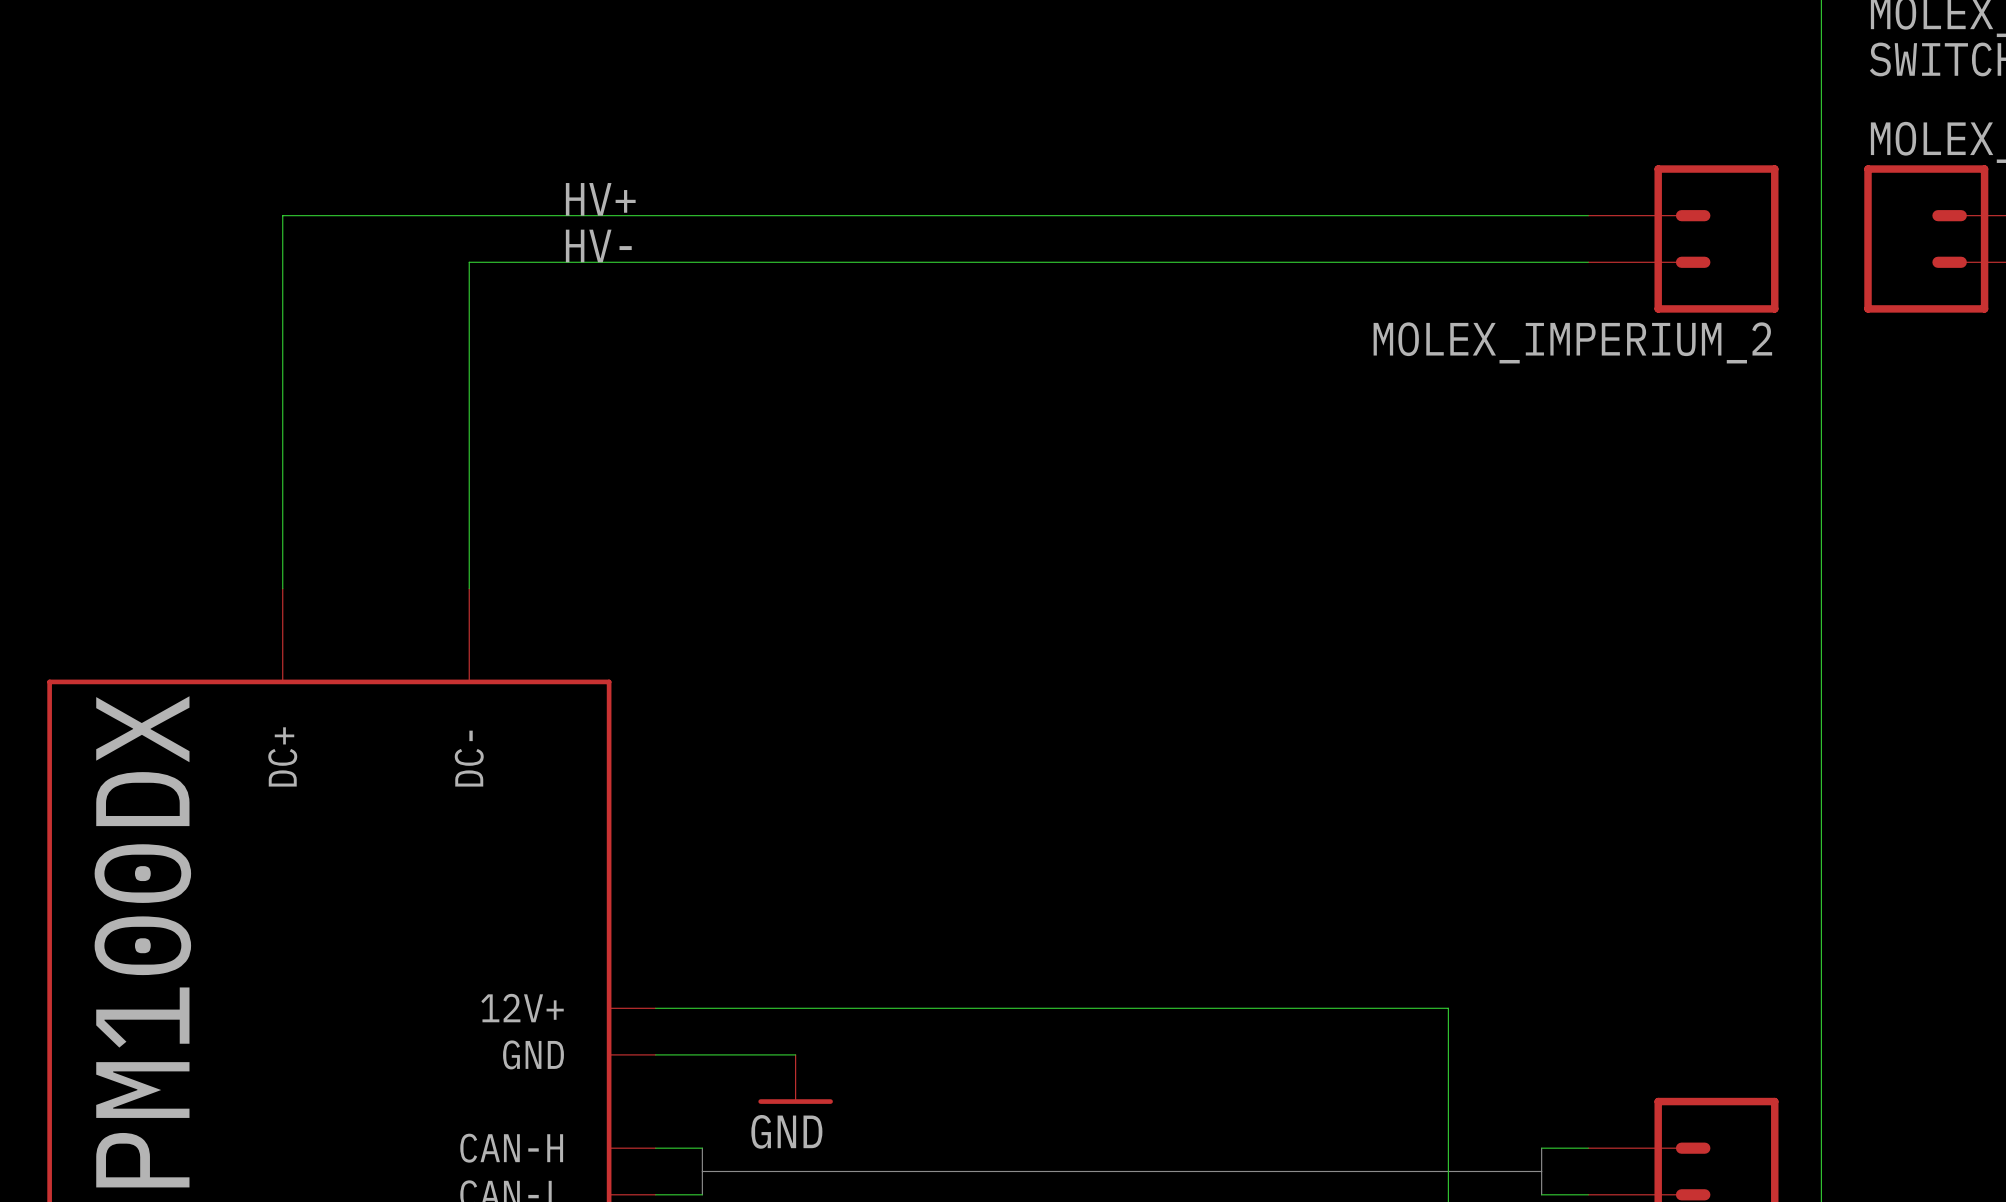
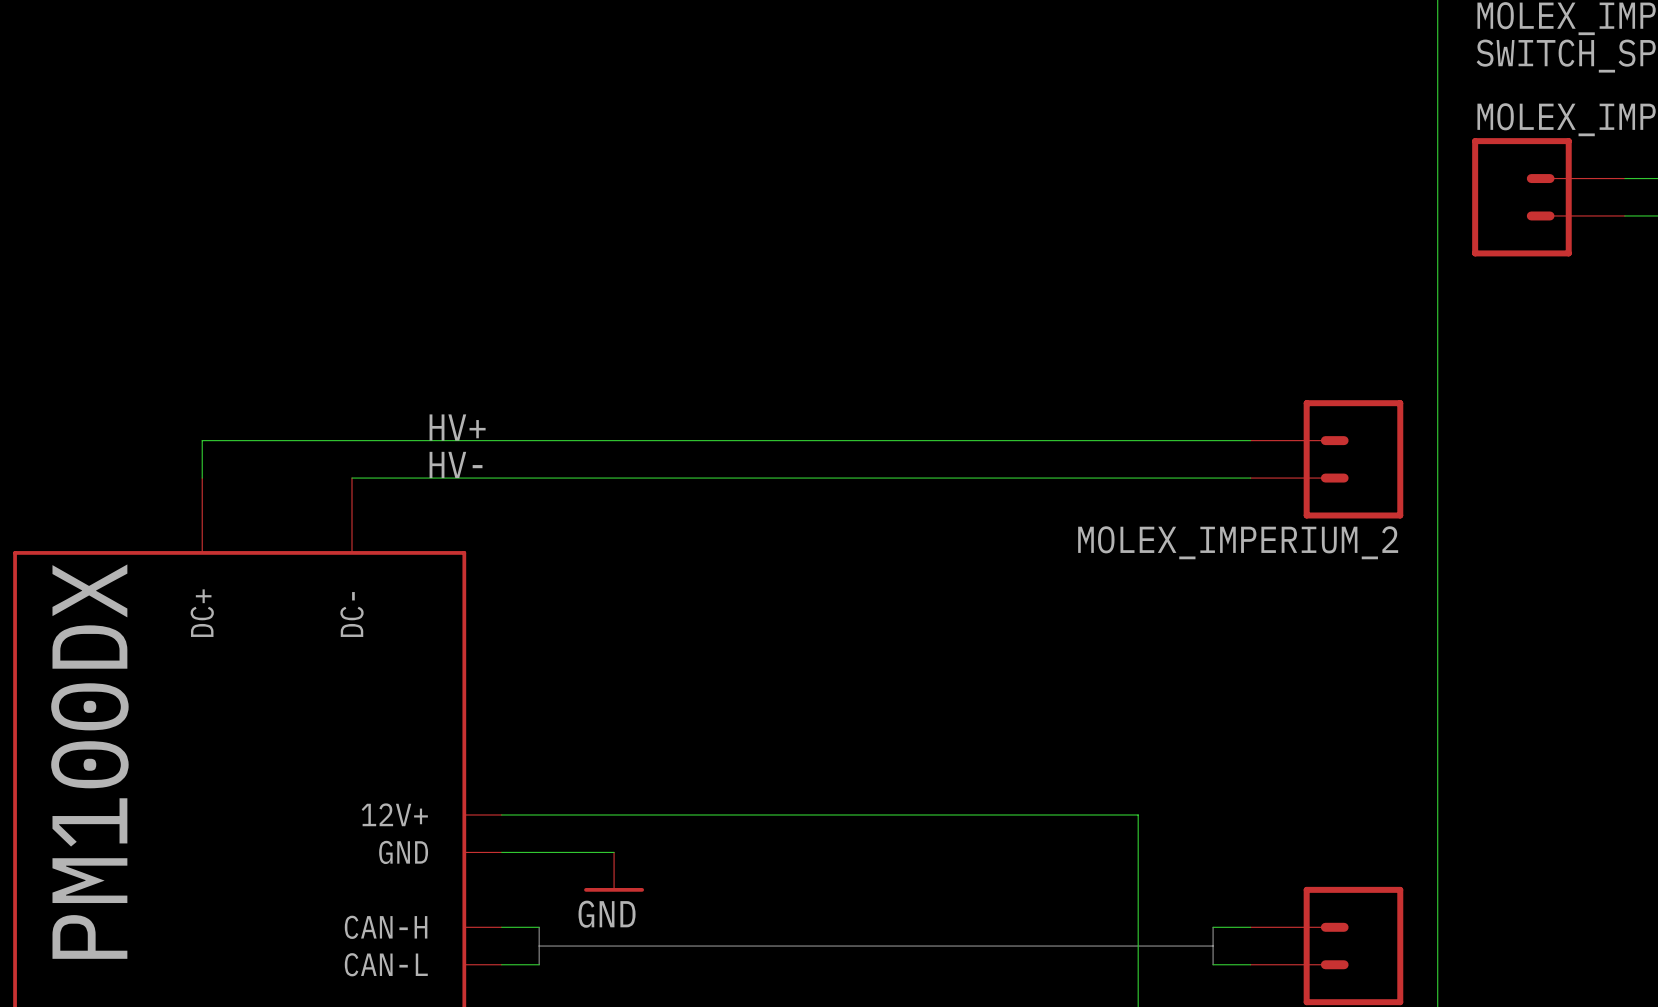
label position: HV+ (600, 199) -> HV+ (457, 427)
wire: (1588, 215) (282, 215) (282, 542) -> (1250, 440) (202, 440)
MOLEX_IMPERIUM_2 position: (1683, 238) -> (1326, 459)
label position: HV- (598, 245) -> HV- (456, 464)
wire: (1588, 262) (469, 262) (469, 588) -> (1250, 478) (351, 478)

